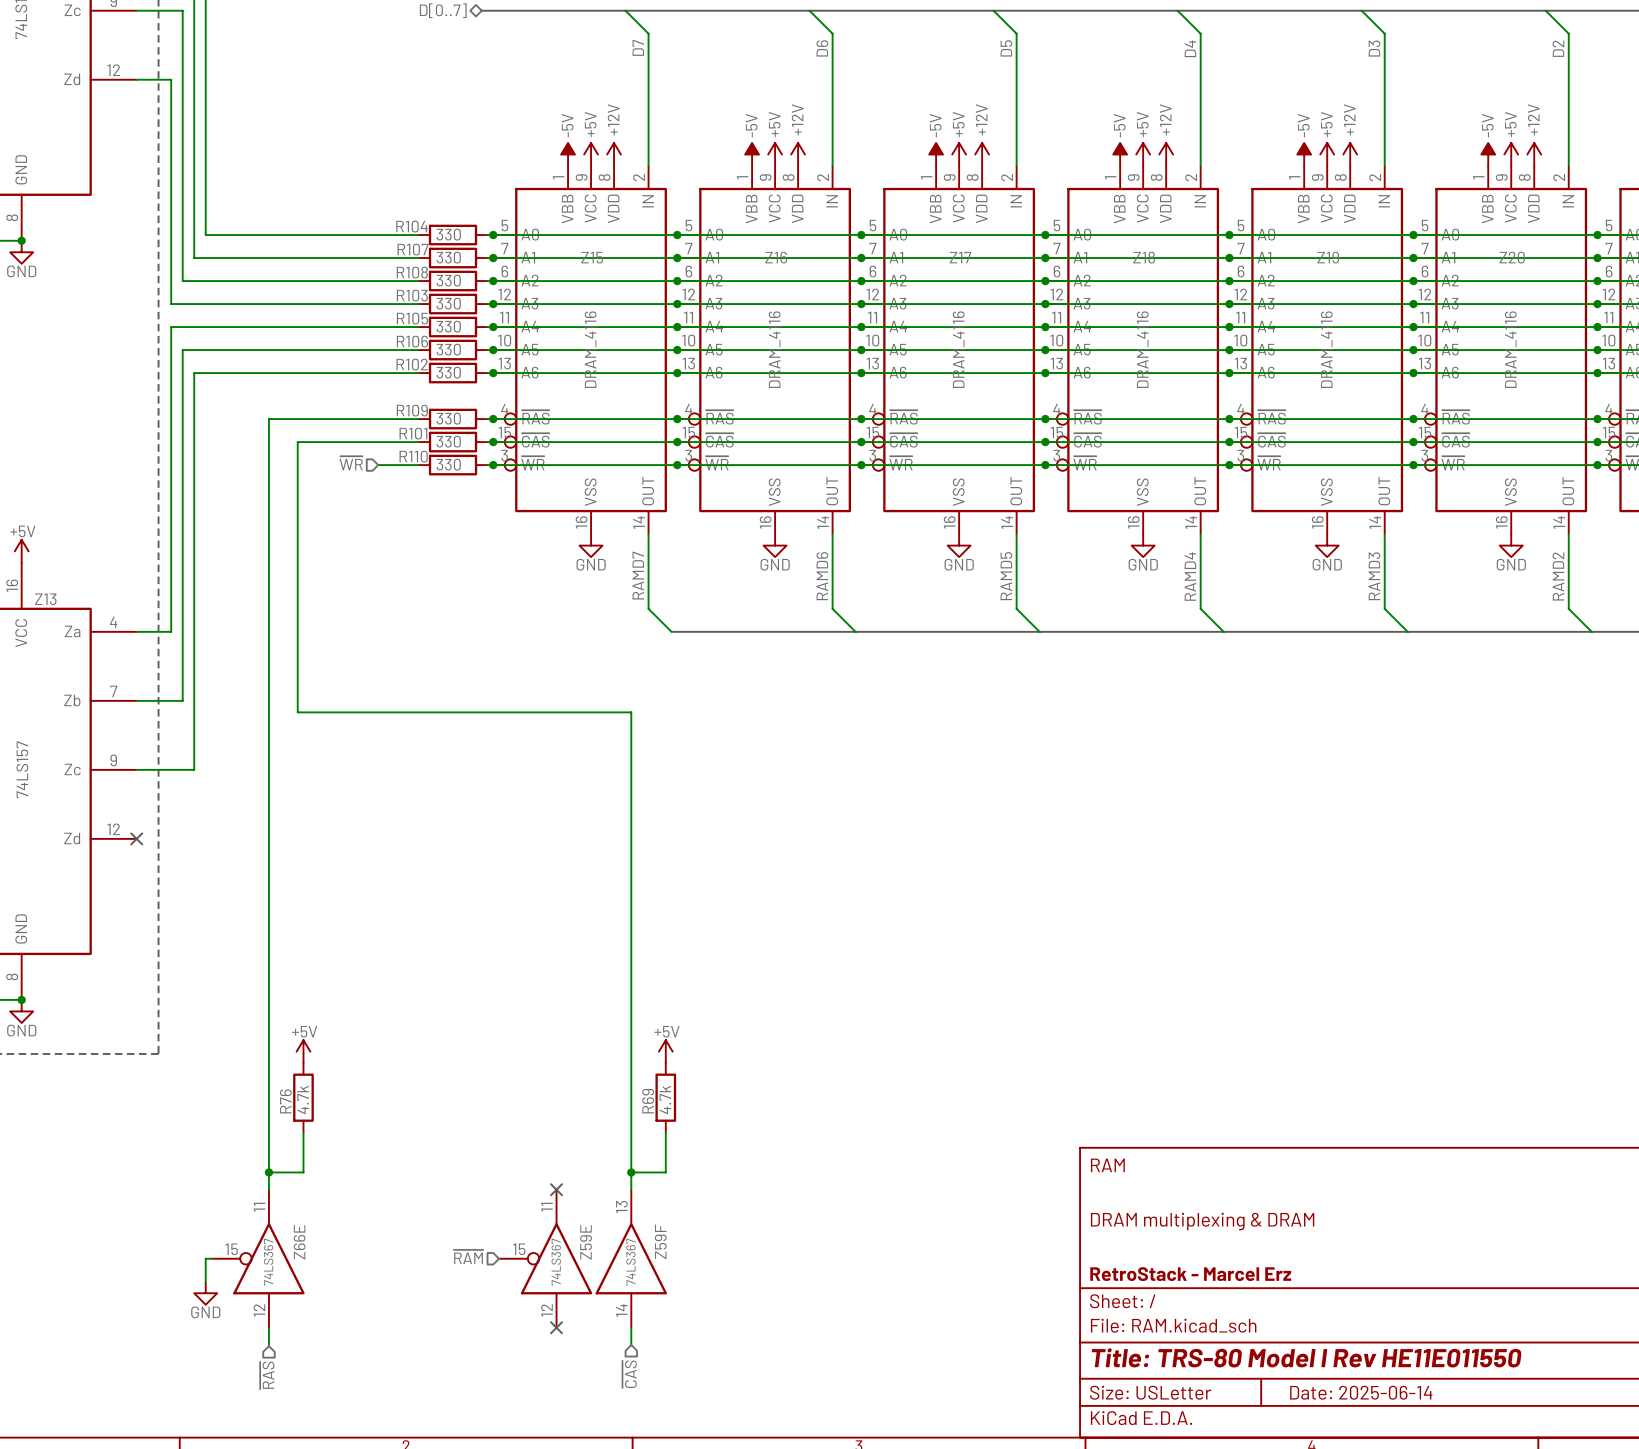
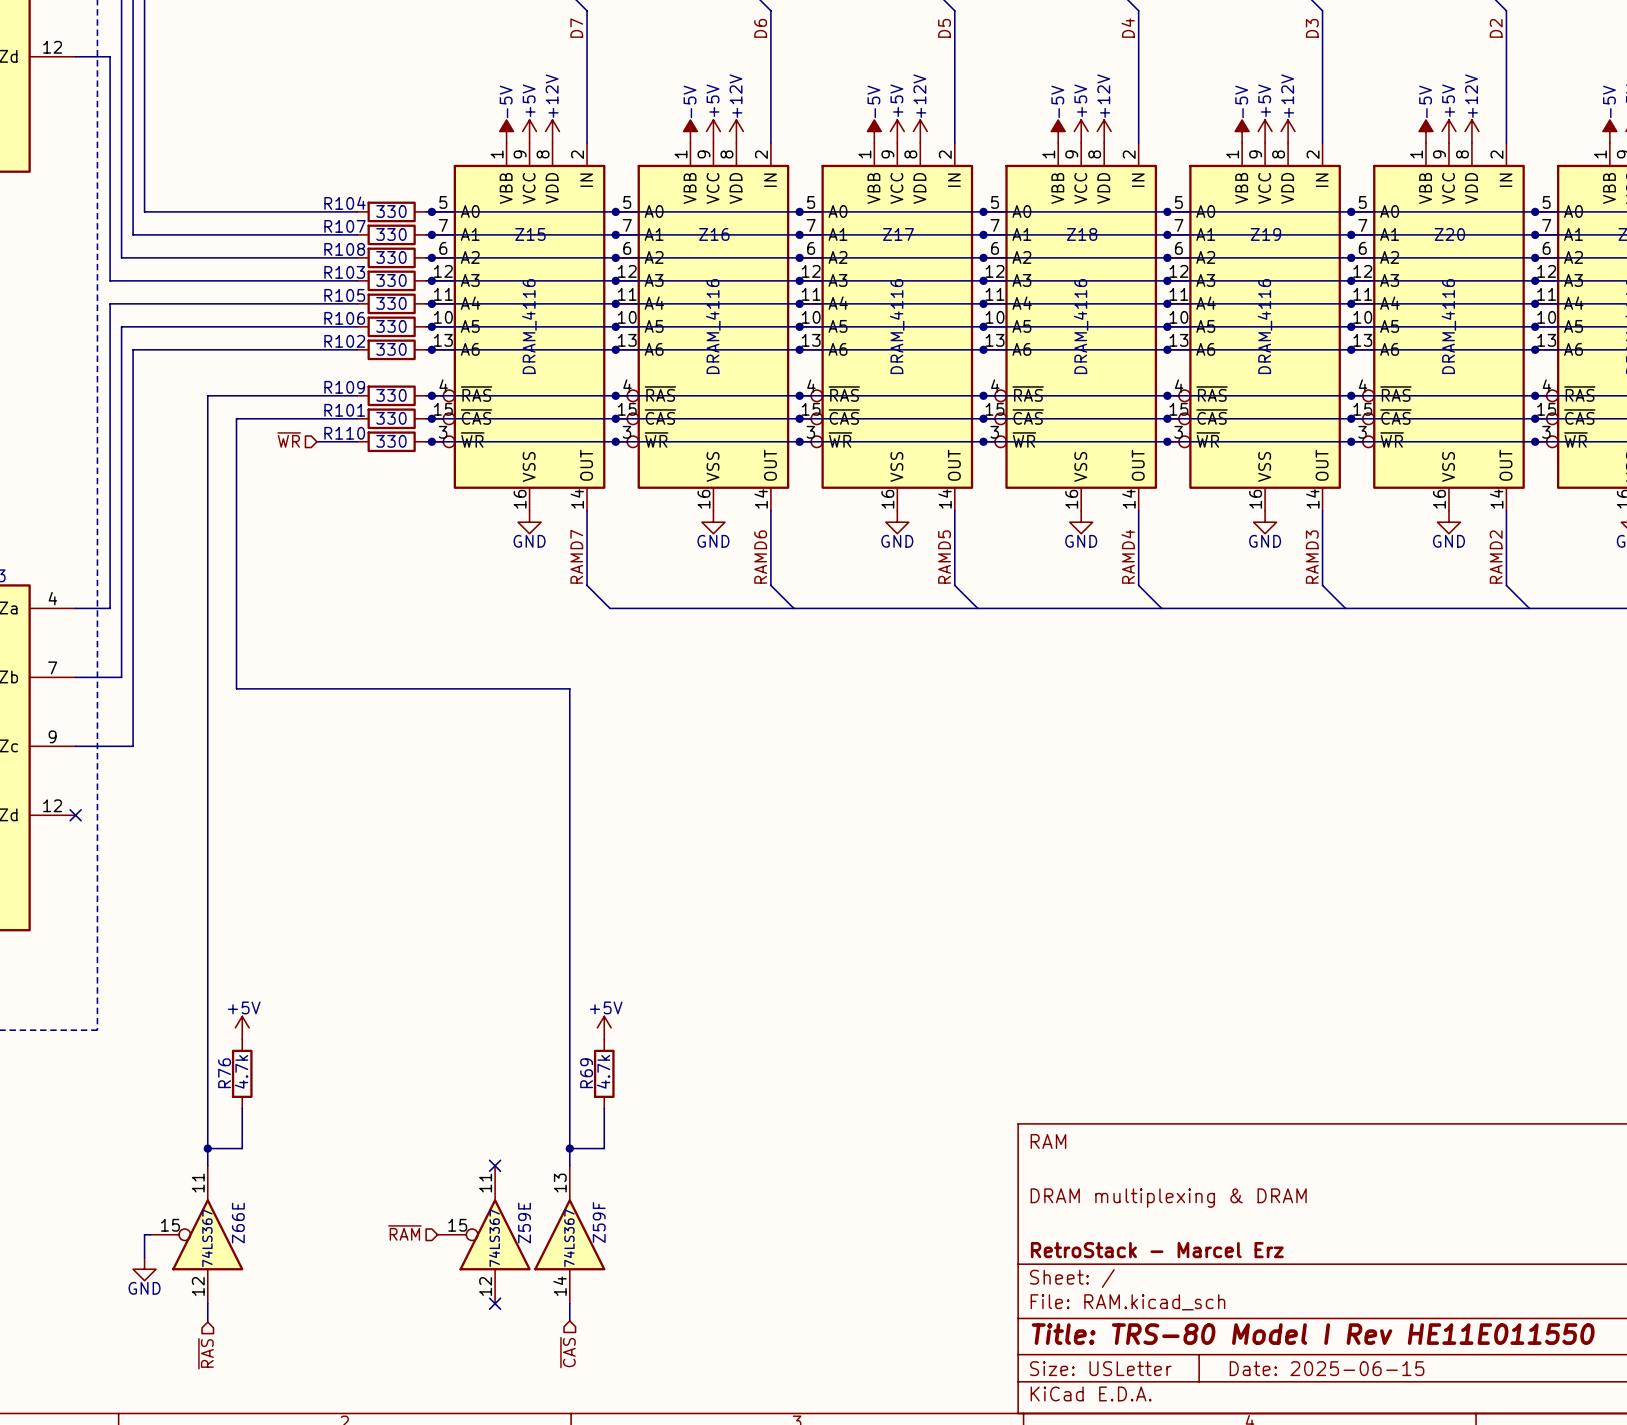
title block: Date: 2025-06-14 (1361, 1392) -> Date: 2025-06-15 (1327, 1368)

